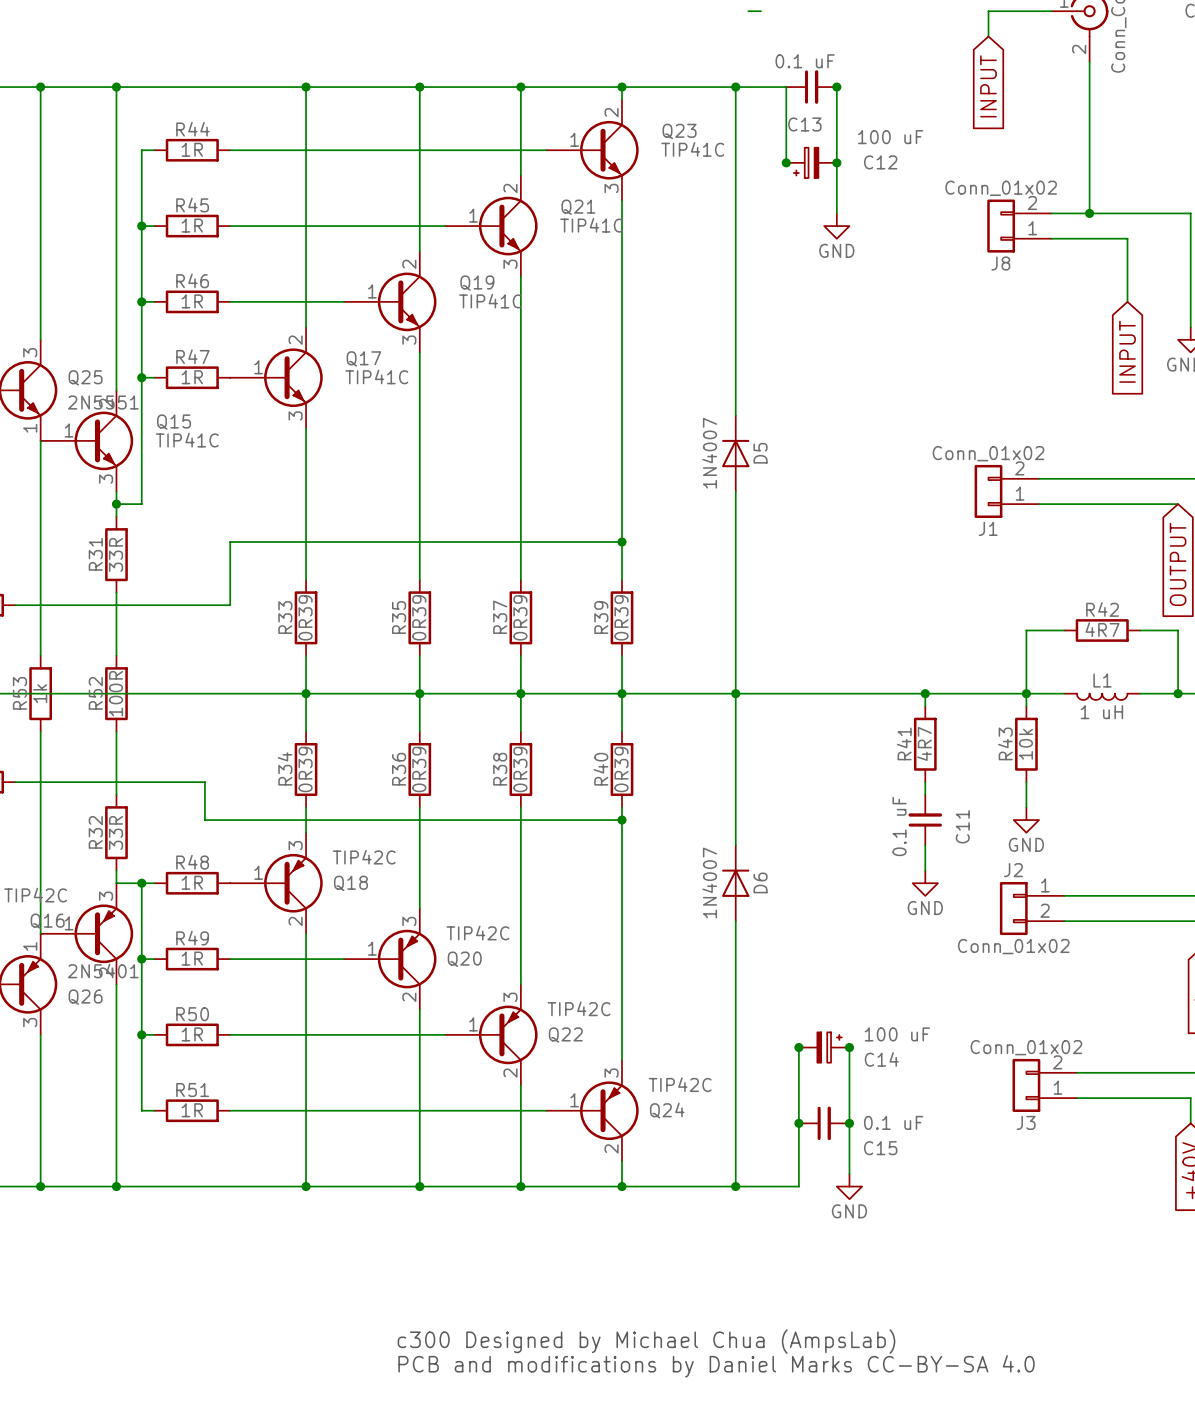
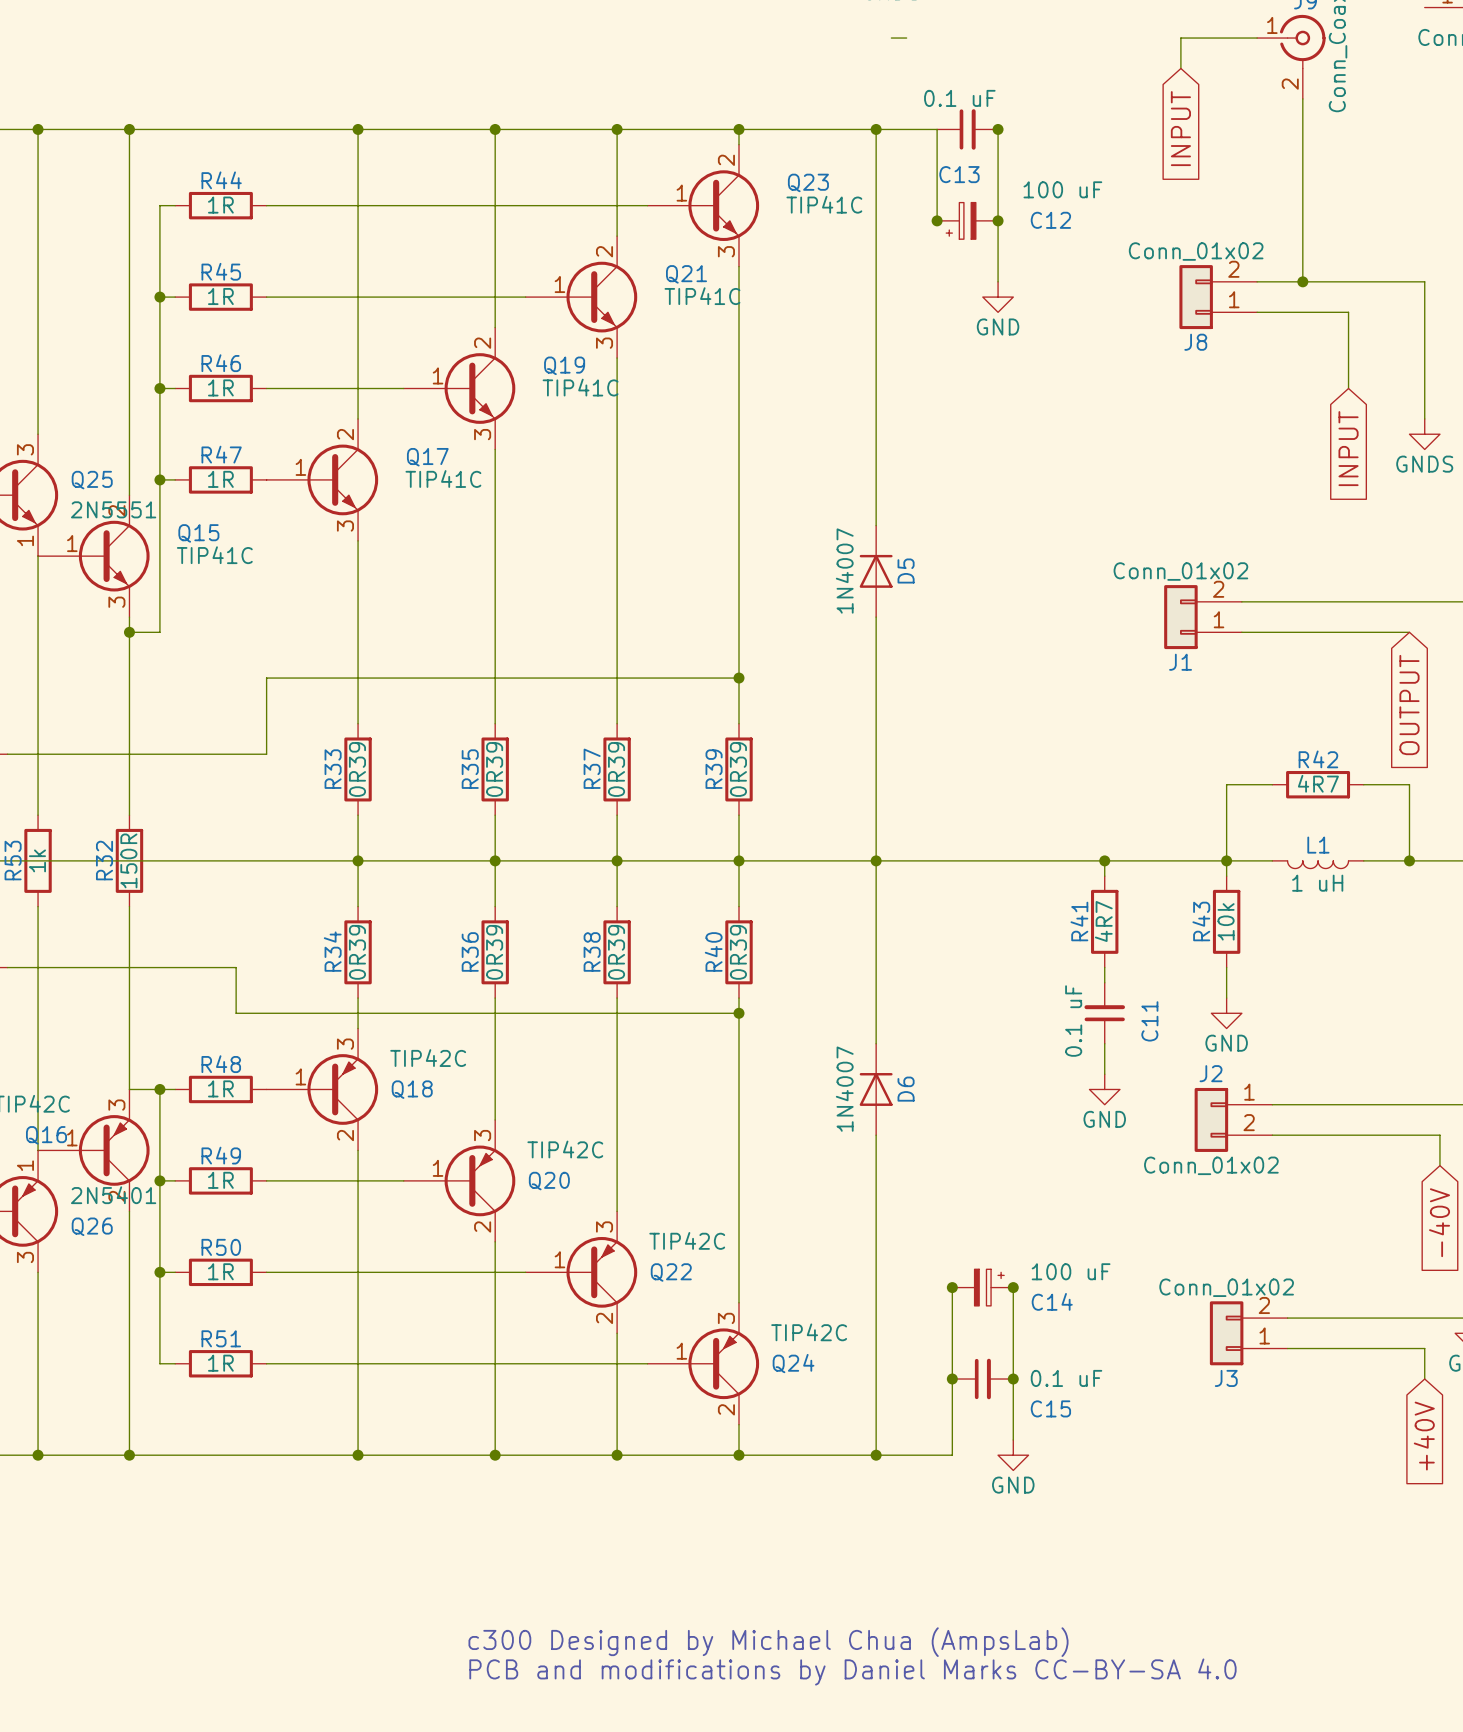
wire: none -> (129, 647) (129, 738)
R31: 33R (116, 554) -> none
R52 name: R52 (95, 693) -> R32 (104, 860)
R52 value: 100R (116, 693) -> 150R (128, 860)
wire: none -> (129, 982) (129, 1074)
R32: 33R (116, 832) -> none

